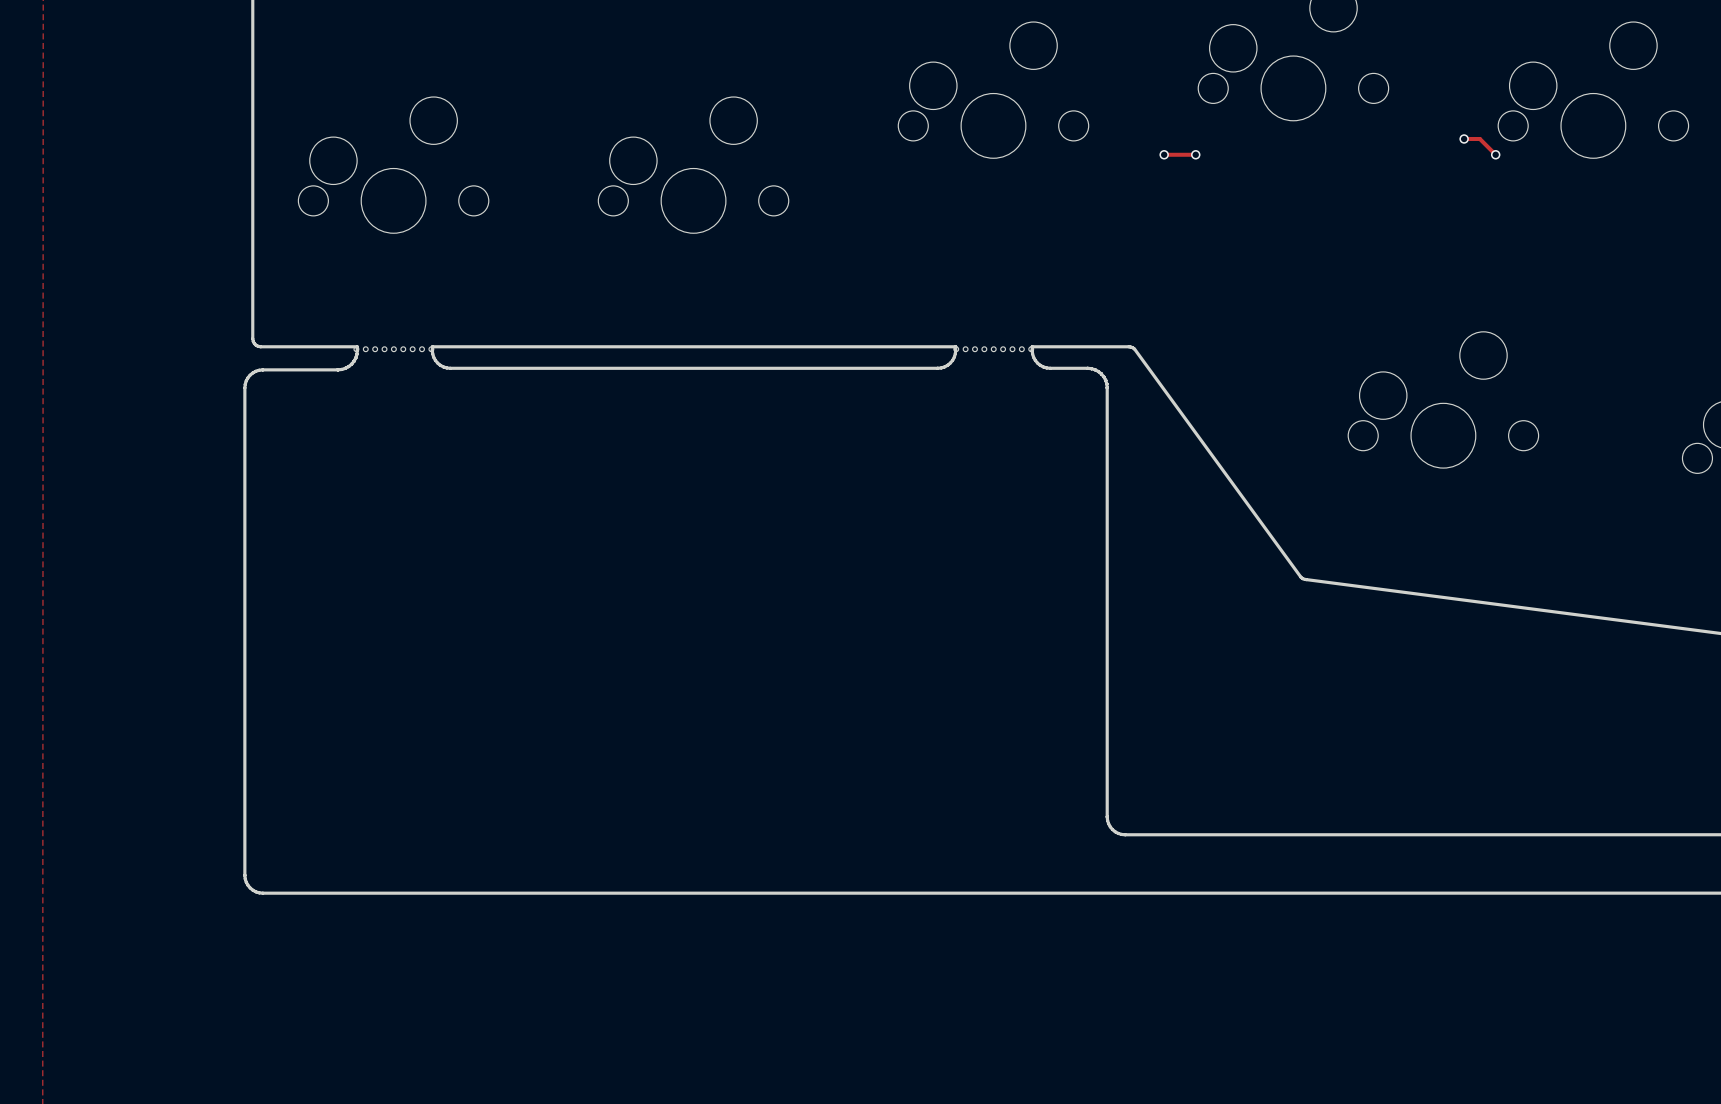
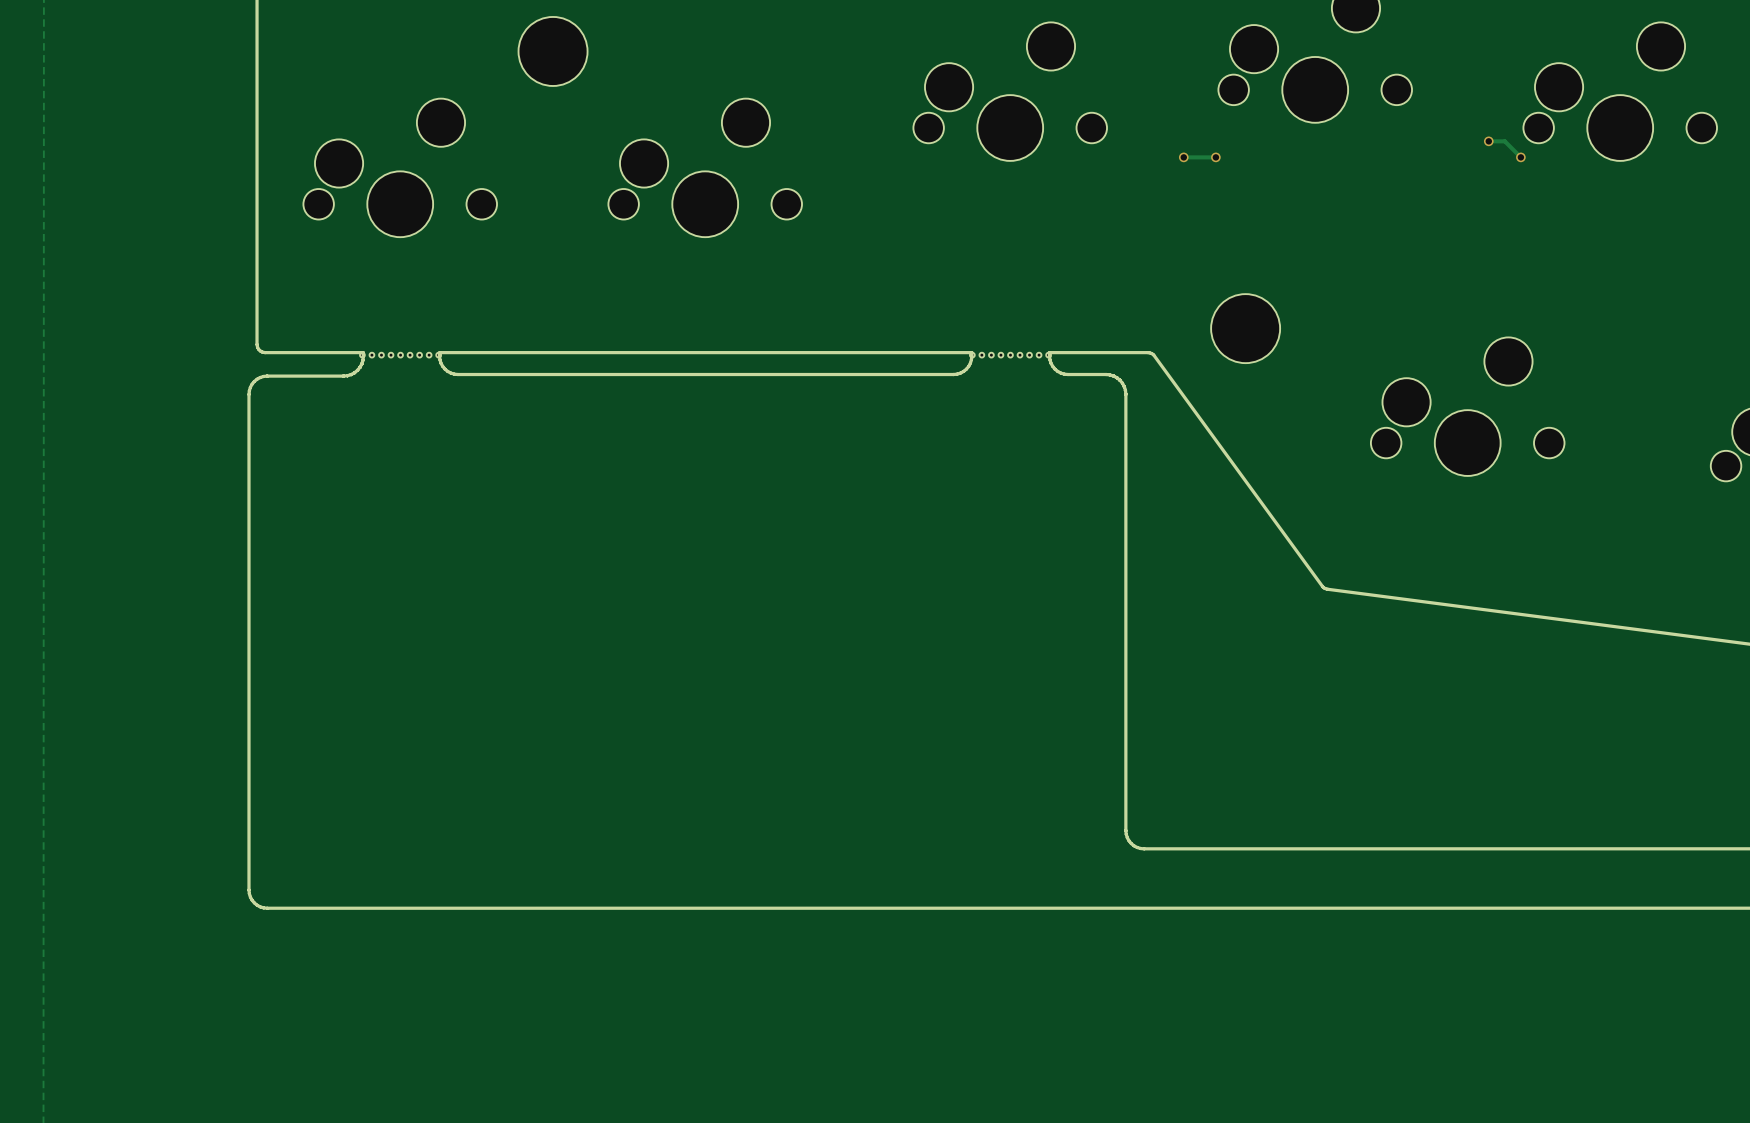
part: none -> (553, 51)
part: none -> (1245, 328)

